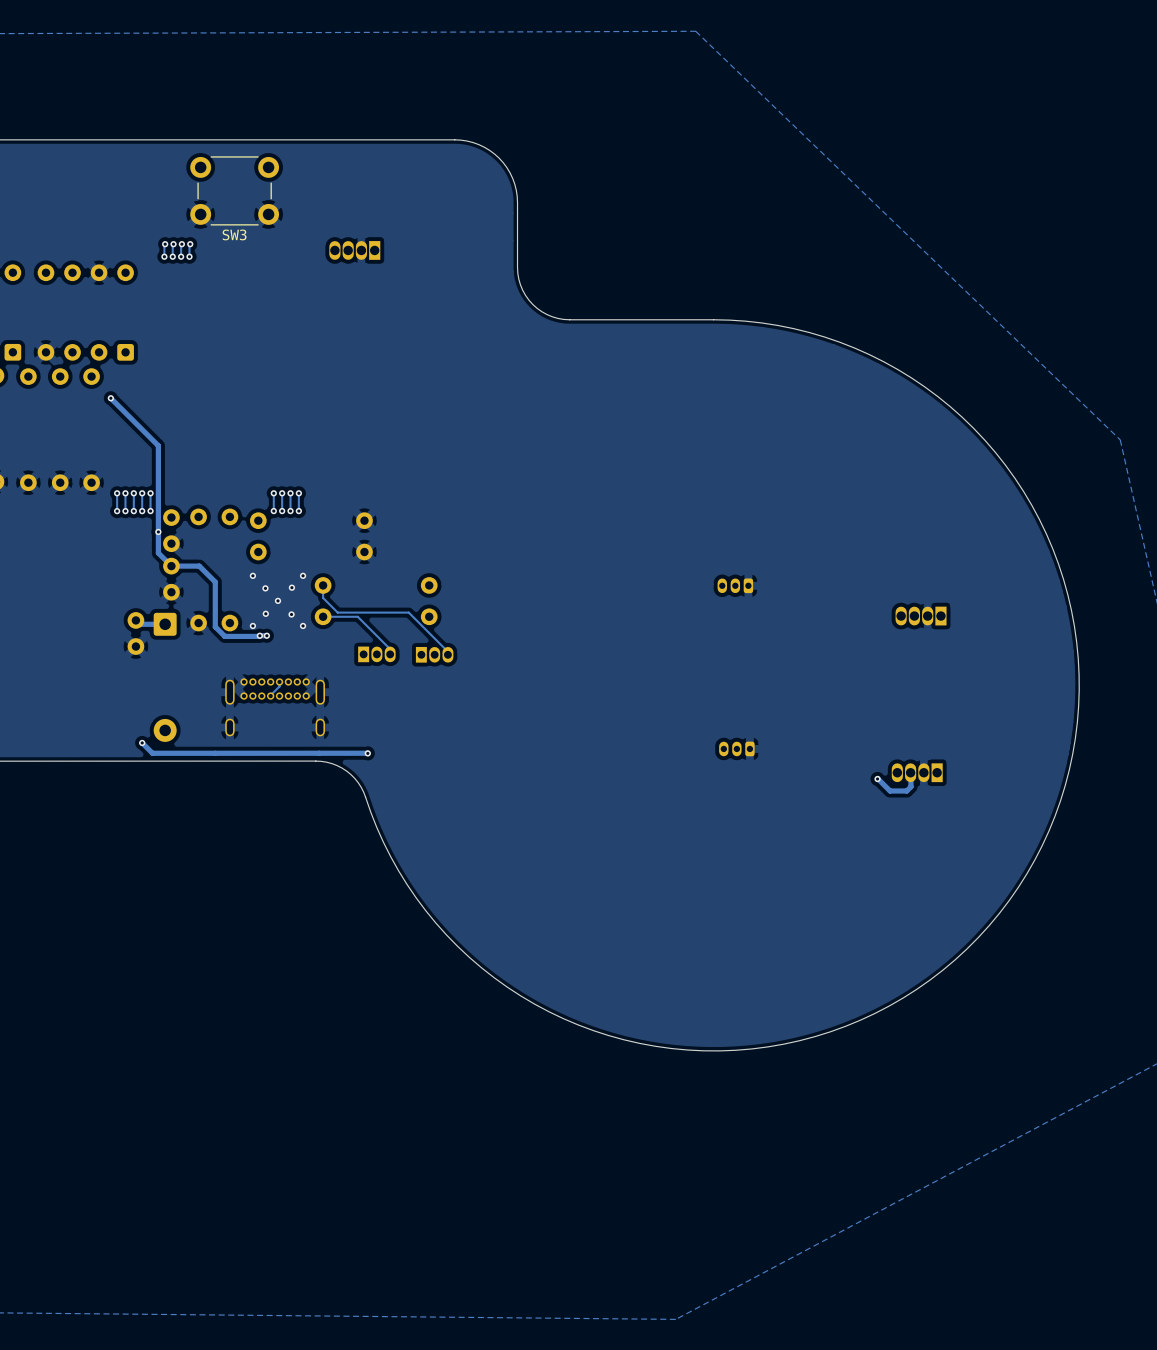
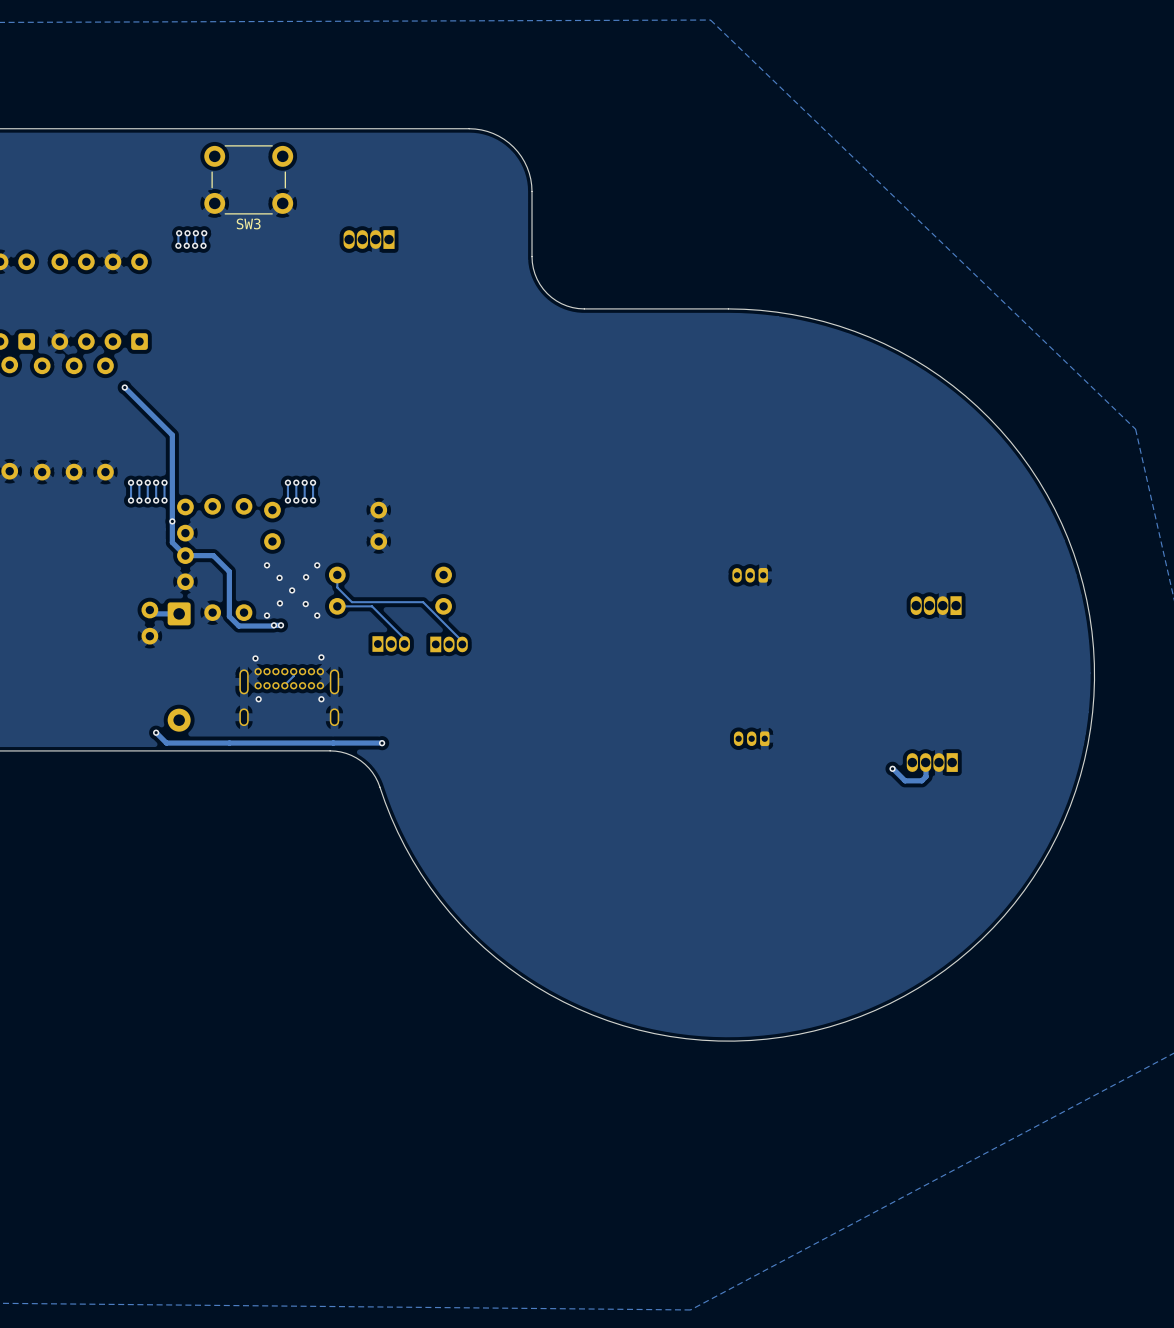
via: none -> (321, 657)
via: none -> (255, 658)
via: none -> (258, 699)
via: none -> (321, 699)

